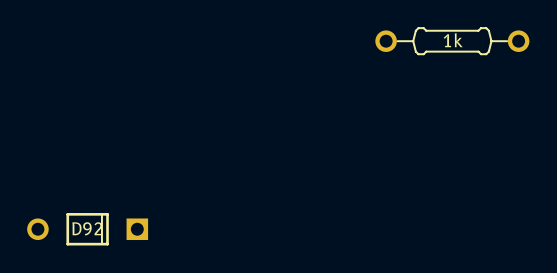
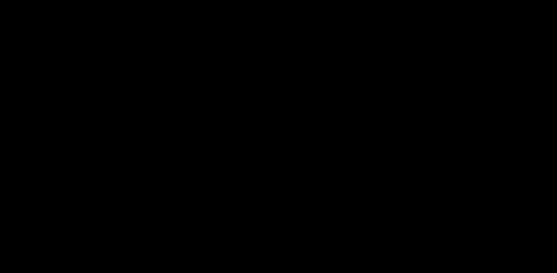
part: 1k (452, 41) -> none
D92: (87, 229) -> none

